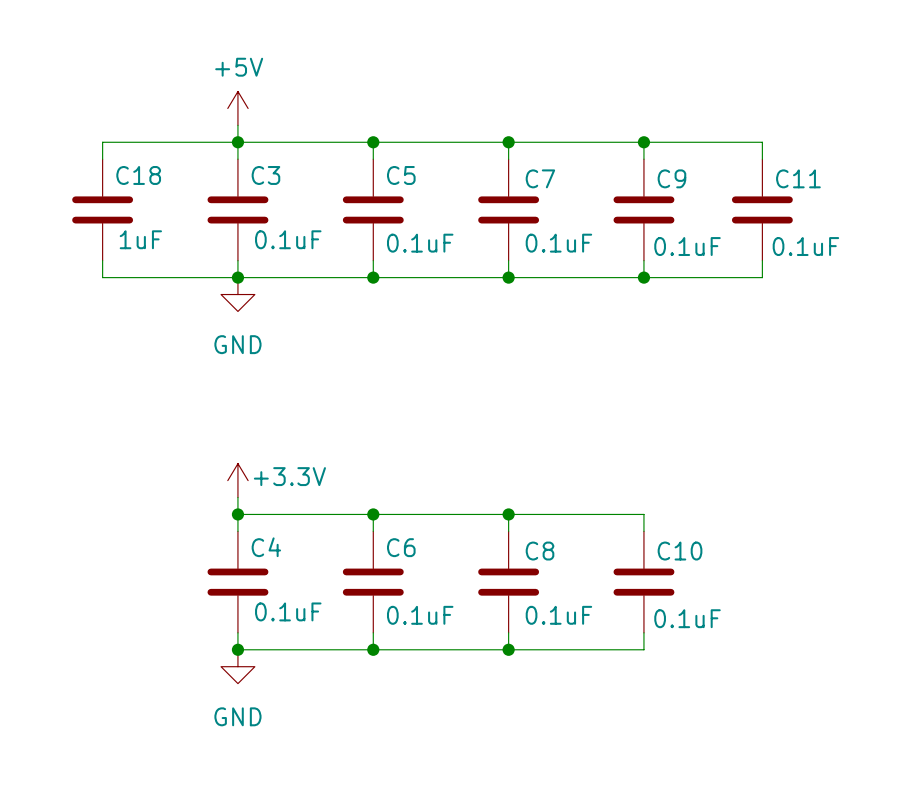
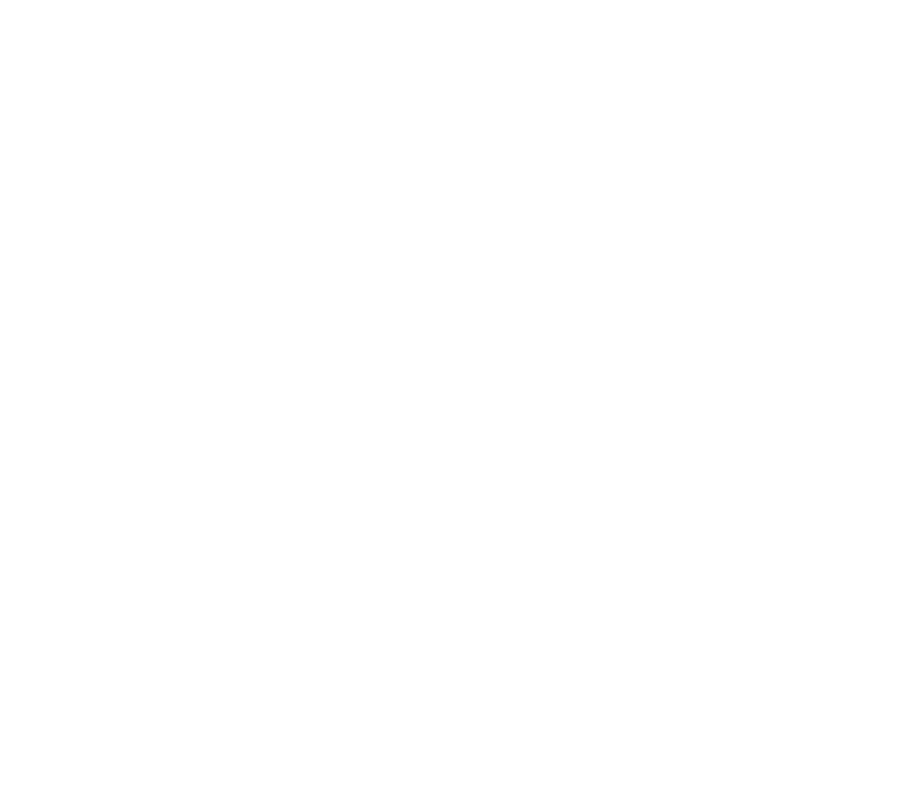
power symbol: +5V (237, 108) -> none
wire: (237, 125) (237, 159) -> none
junction: (237, 142) -> none
wire: (373, 142) (373, 159) -> none
junction: (373, 142) -> none
wire: (508, 142) (508, 159) -> none
junction: (508, 142) -> none
wire: (643, 142) (643, 159) -> none
junction: (643, 142) -> none
wire: (102, 159) (102, 142) (762, 142) (762, 159) -> none
C18: 1uF (102, 209) -> none
C3: 0.1uF (237, 209) -> none
C5: 0.1uF (373, 209) -> none
C7: 0.1uF (508, 209) -> none
C9: 0.1uF (643, 209) -> none
C11: 0.1uF (762, 209) -> none
wire: (102, 260) (102, 277) (762, 277) (762, 260) -> none
wire: (237, 260) (237, 277) -> none
wire: (373, 260) (373, 277) -> none
wire: (508, 260) (508, 277) -> none
wire: (643, 260) (643, 277) -> none
junction: (237, 277) -> none
junction: (373, 277) -> none
junction: (508, 277) -> none
junction: (643, 277) -> none
power symbol: GND (237, 294) -> none
power symbol: +3.3V (237, 480) -> none
wire: (237, 497) (237, 531) -> none
wire: (237, 514) (643, 514) (643, 531) -> none
junction: (237, 514) -> none
wire: (373, 514) (373, 531) -> none
junction: (373, 514) -> none
wire: (508, 514) (508, 531) -> none
junction: (508, 514) -> none
C4: 0.1uF (237, 582) -> none
C6: 0.1uF (373, 582) -> none
C8: 0.1uF (508, 582) -> none
C10: 0.1uF (643, 582) -> none
wire: (237, 632) (237, 649) (643, 649) (643, 632) -> none
wire: (373, 632) (373, 649) -> none
wire: (508, 632) (508, 649) -> none
junction: (237, 649) -> none
junction: (373, 649) -> none
junction: (508, 649) -> none
power symbol: GND (237, 666) -> none

